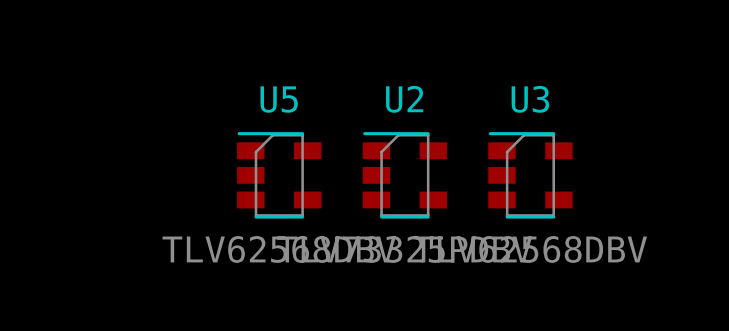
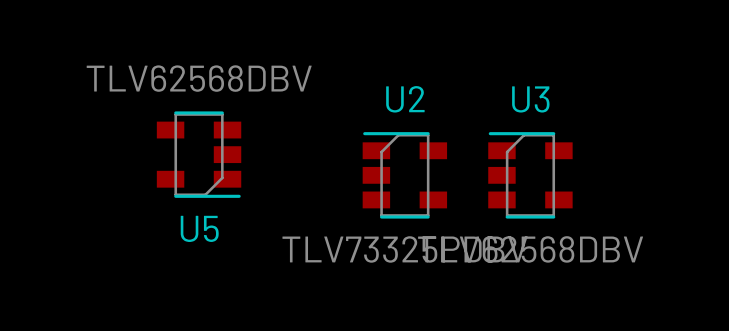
U5 rotation: 0° (279, 175) -> 180° (199, 154)
U5 position: (279, 175) -> (199, 154)

